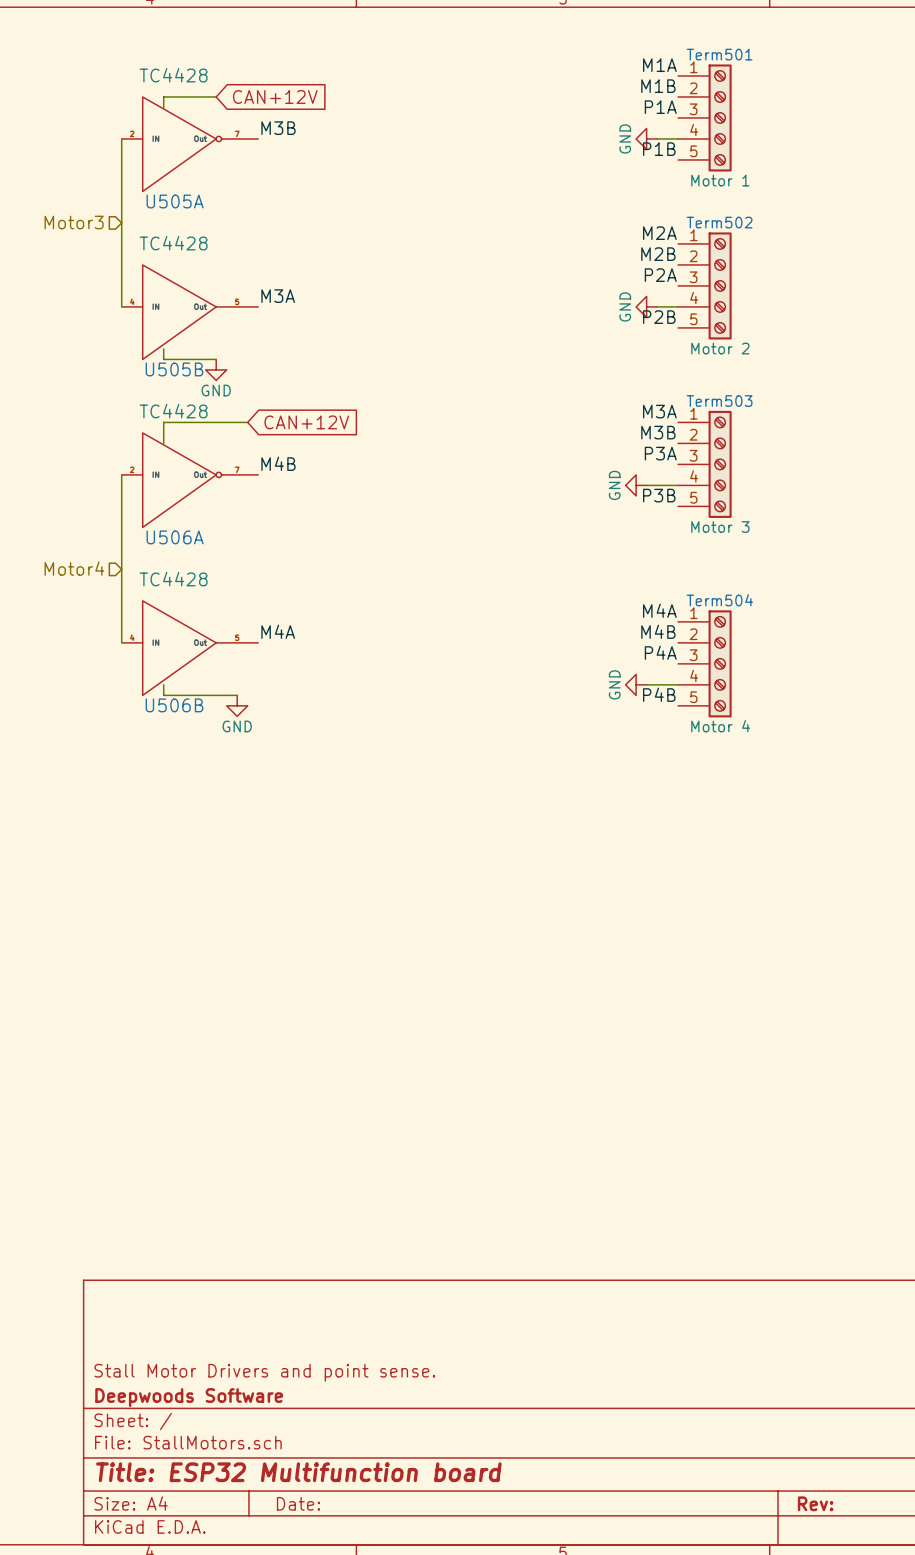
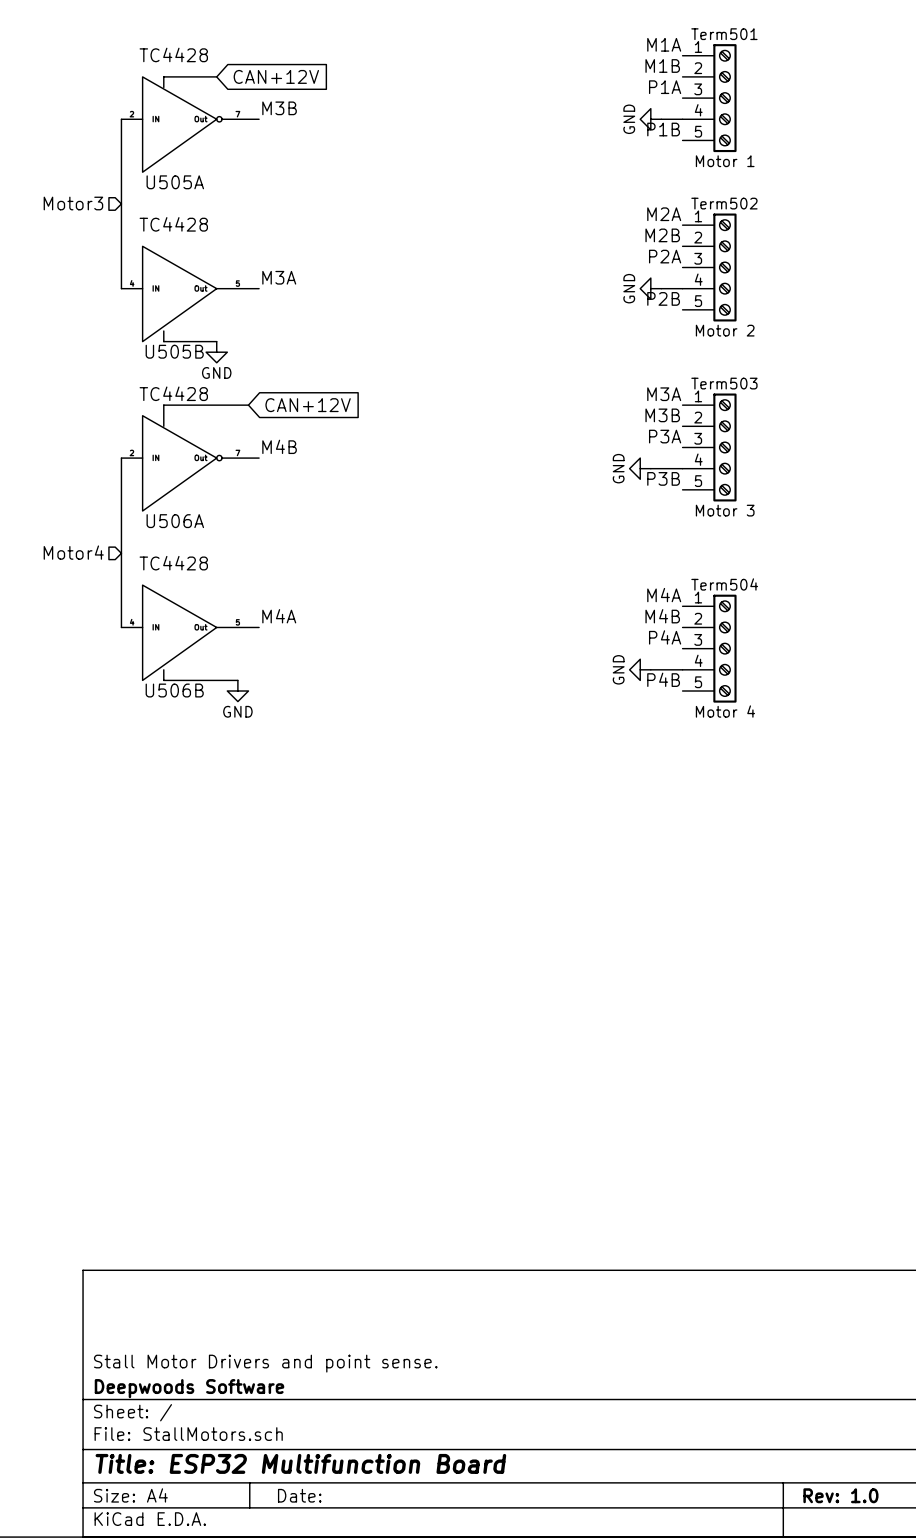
title block: Title: ESP32 Multifunction board (298, 1472) -> Title: ESP32 Multifunction Board (300, 1463)
title block: Rev: (815, 1503) -> Rev: 1.0 (840, 1495)

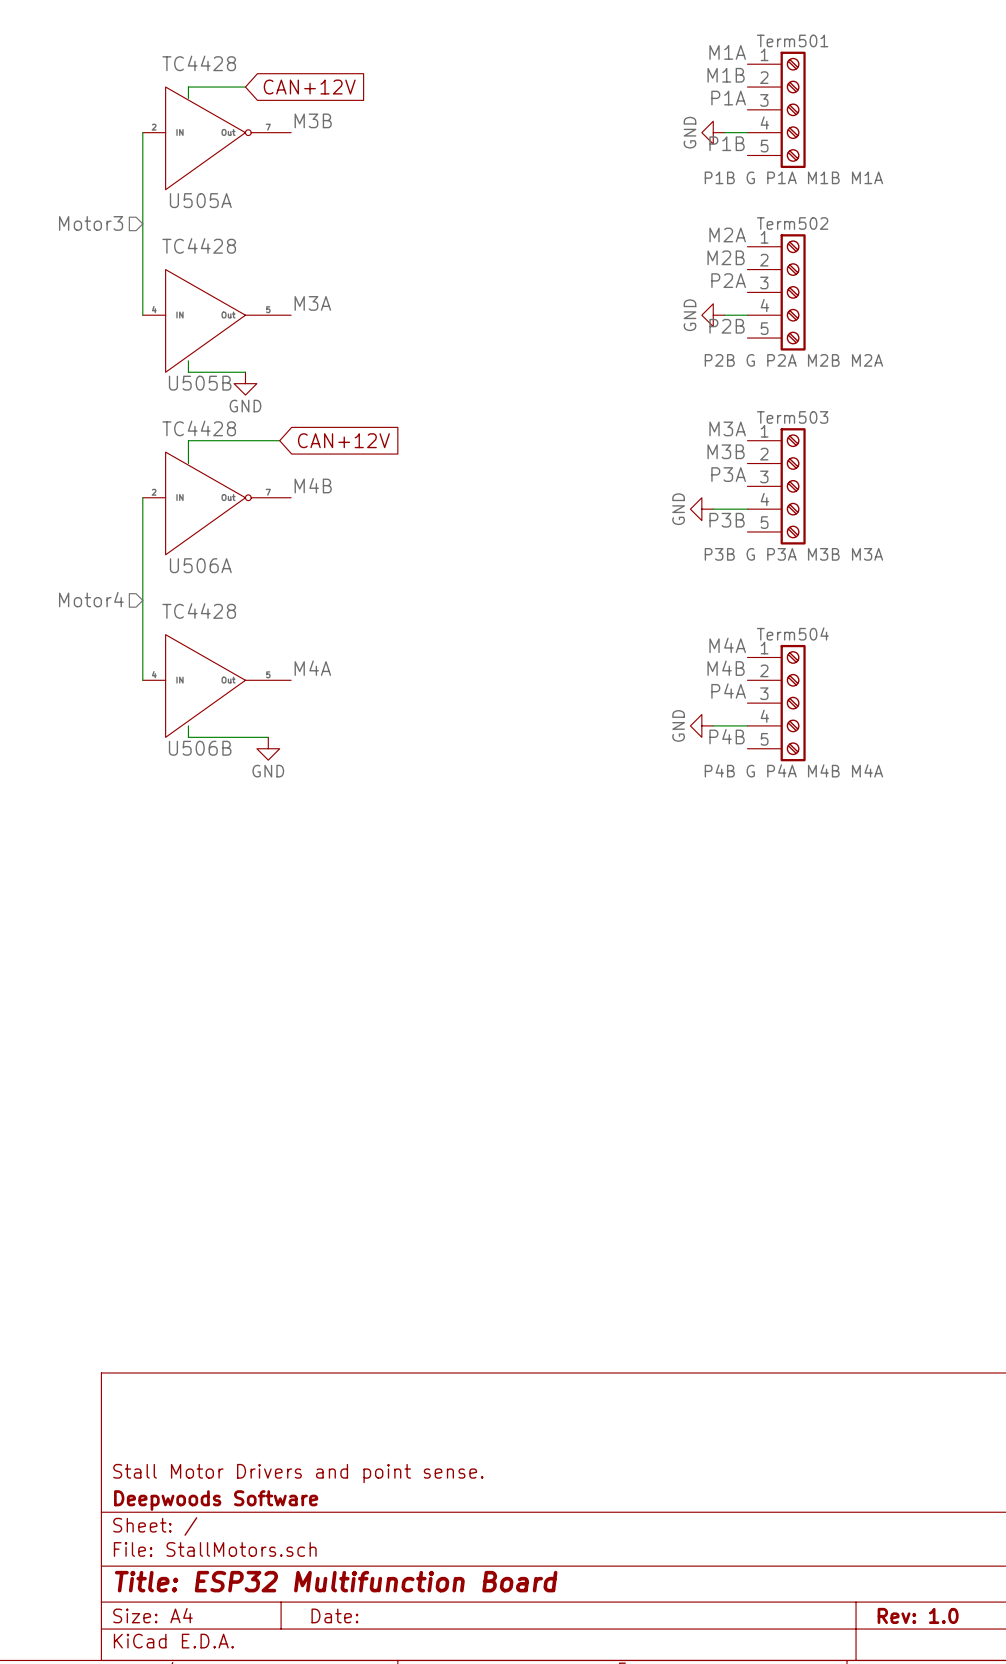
Term501 value: Motor 1 (725, 161) -> P1B G P1A M1B M1A (793, 177)
Term502 value: Motor 2 (725, 330) -> P2B G P2A M2B M2A (793, 360)
Term503 value: Motor 3 (725, 510) -> P3B G P3A M3B M3A (793, 554)
Term504 value: Motor 4 (725, 711) -> P4B G P4A M4B M4A (793, 770)

